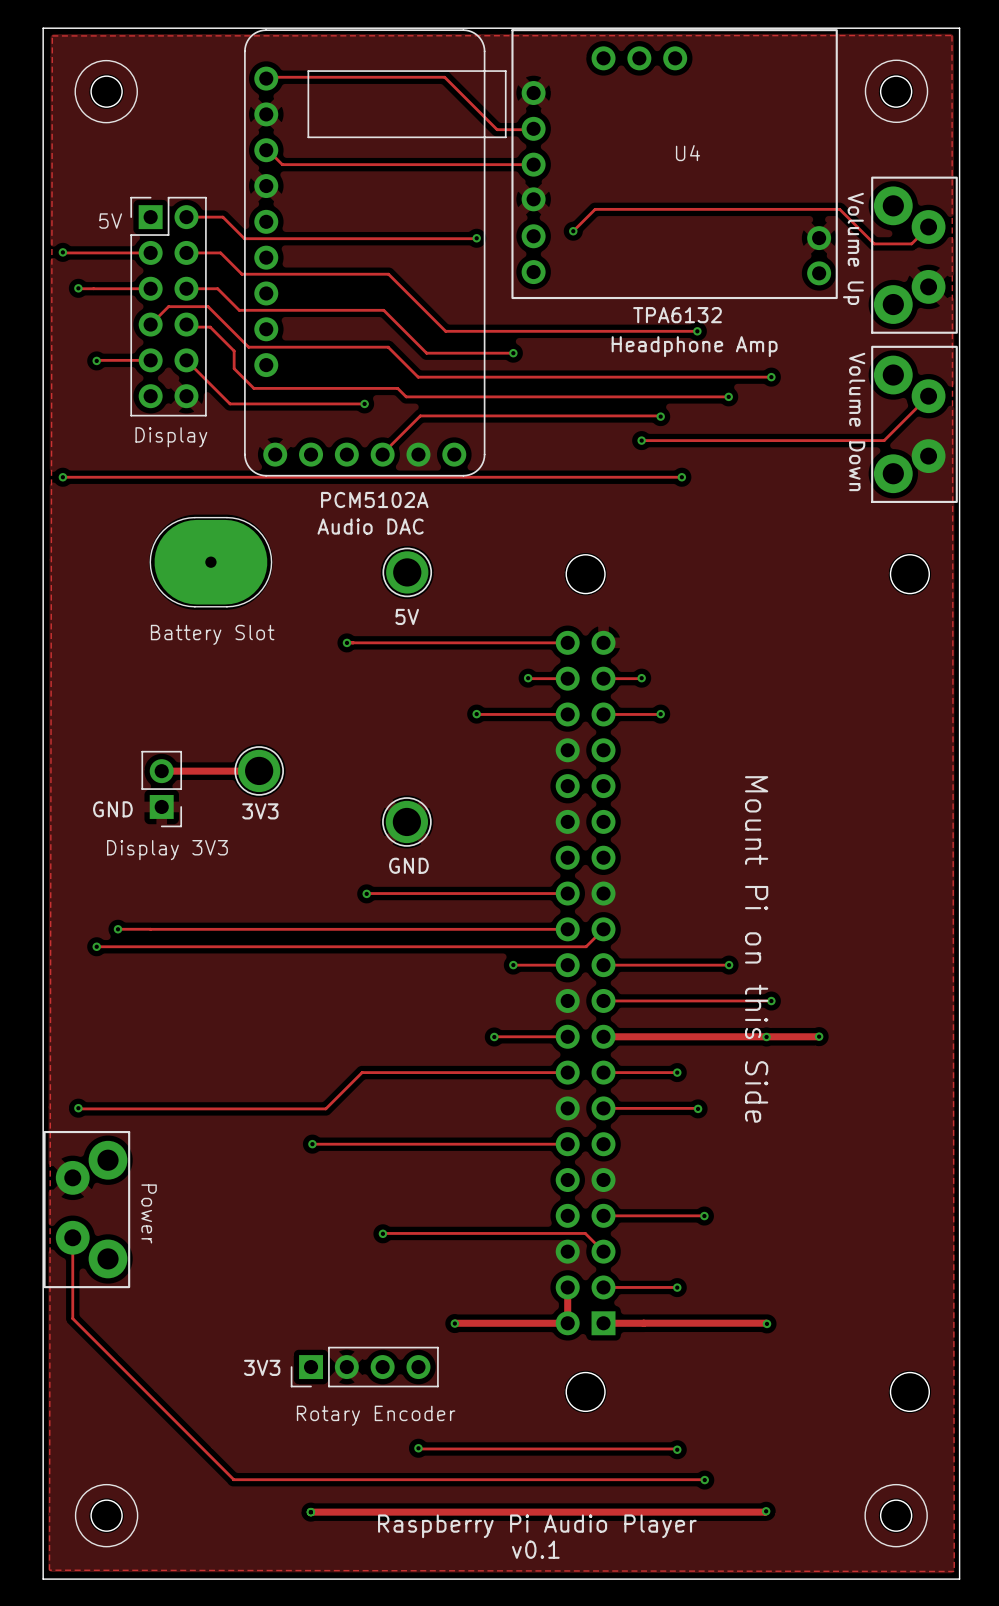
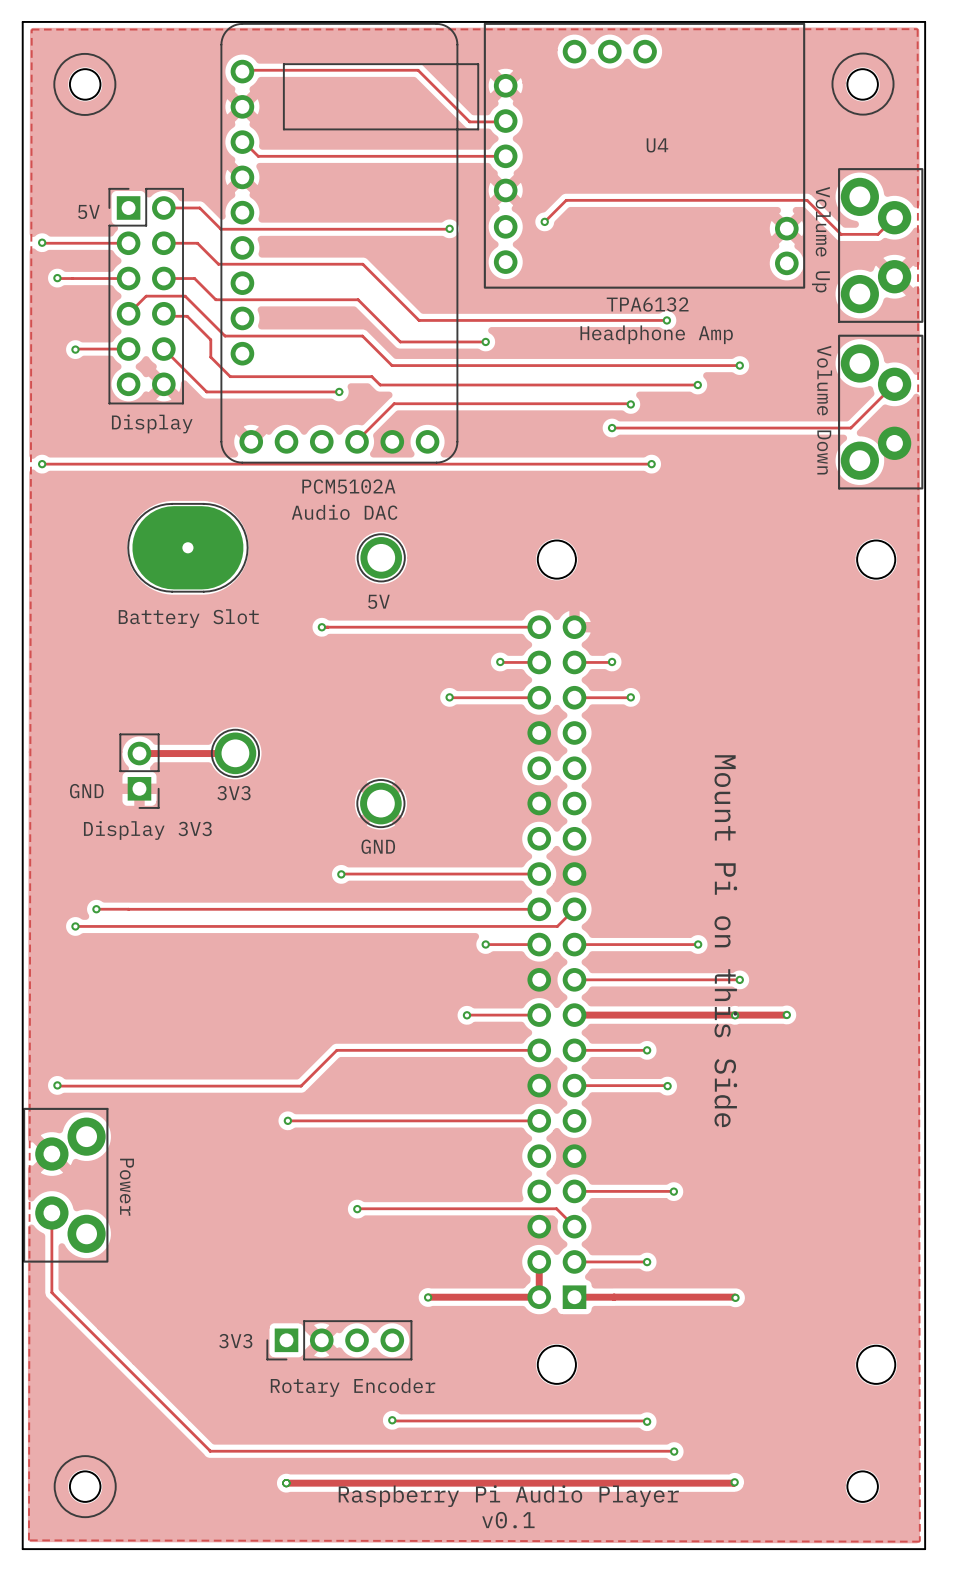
drawing: [864, 1483, 928, 1548] -> none

